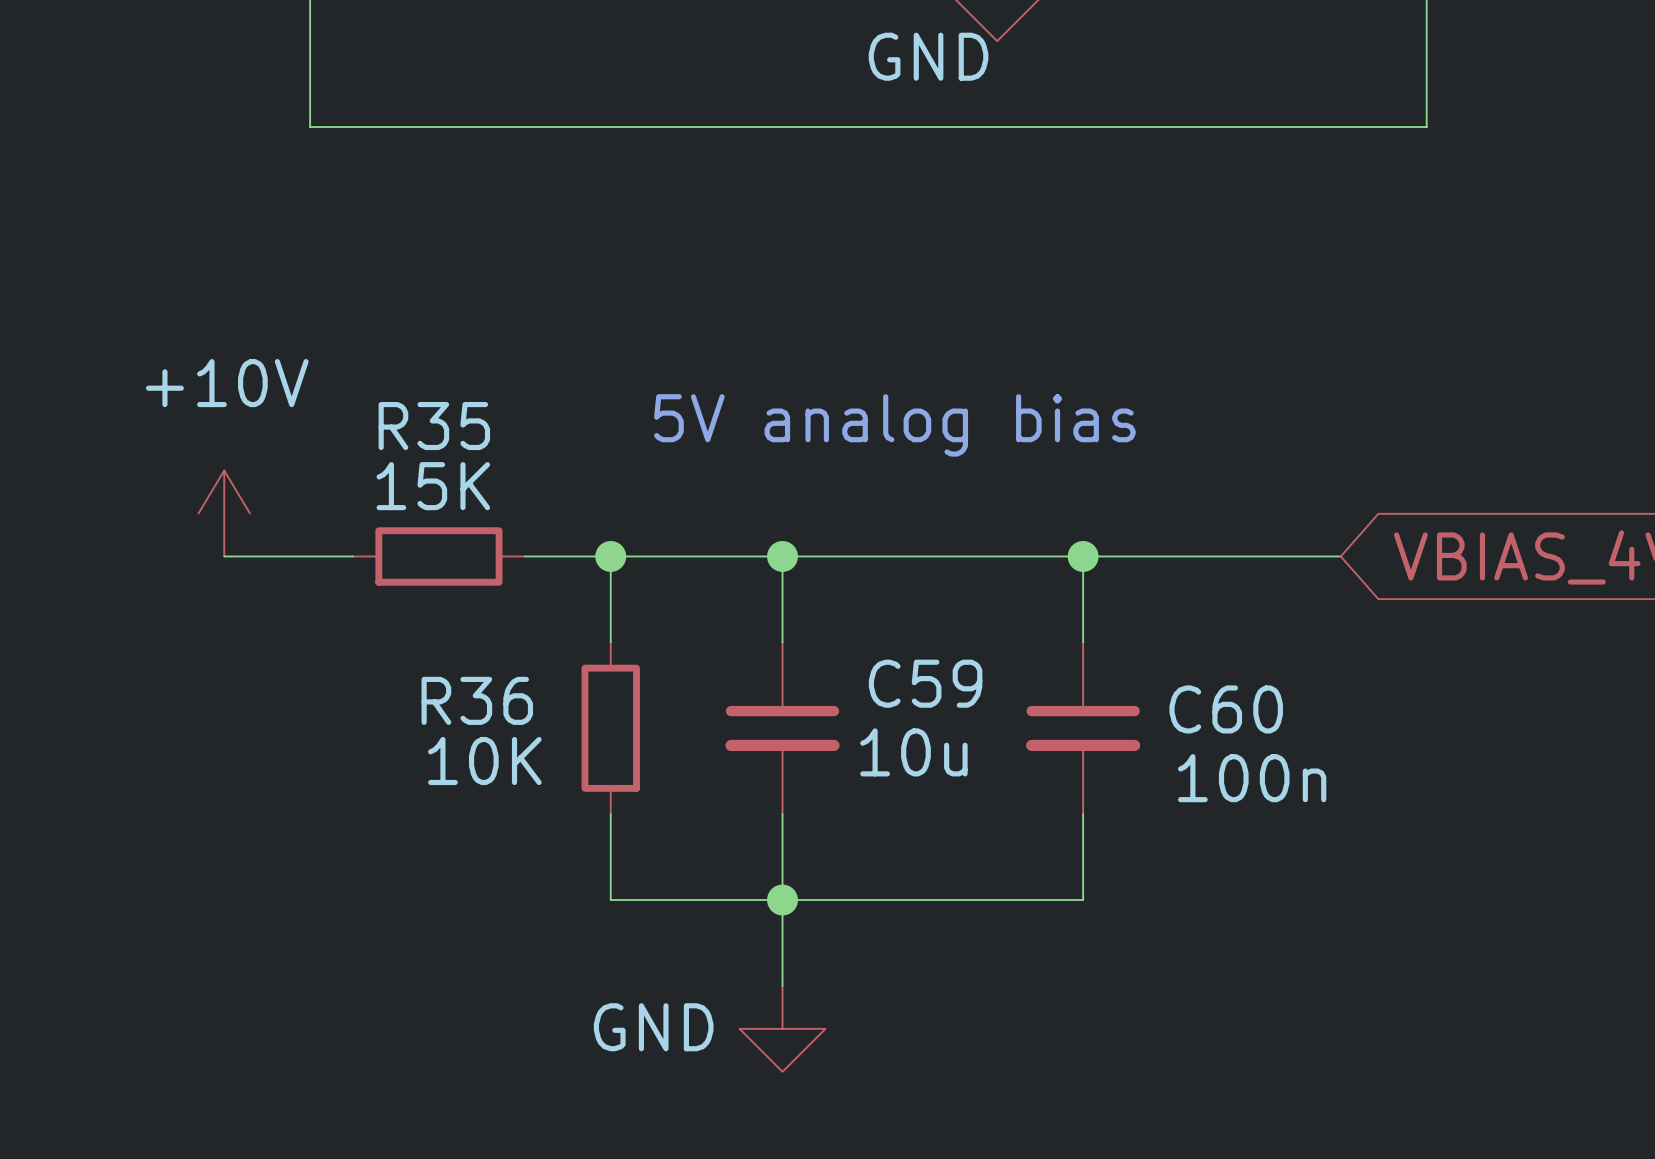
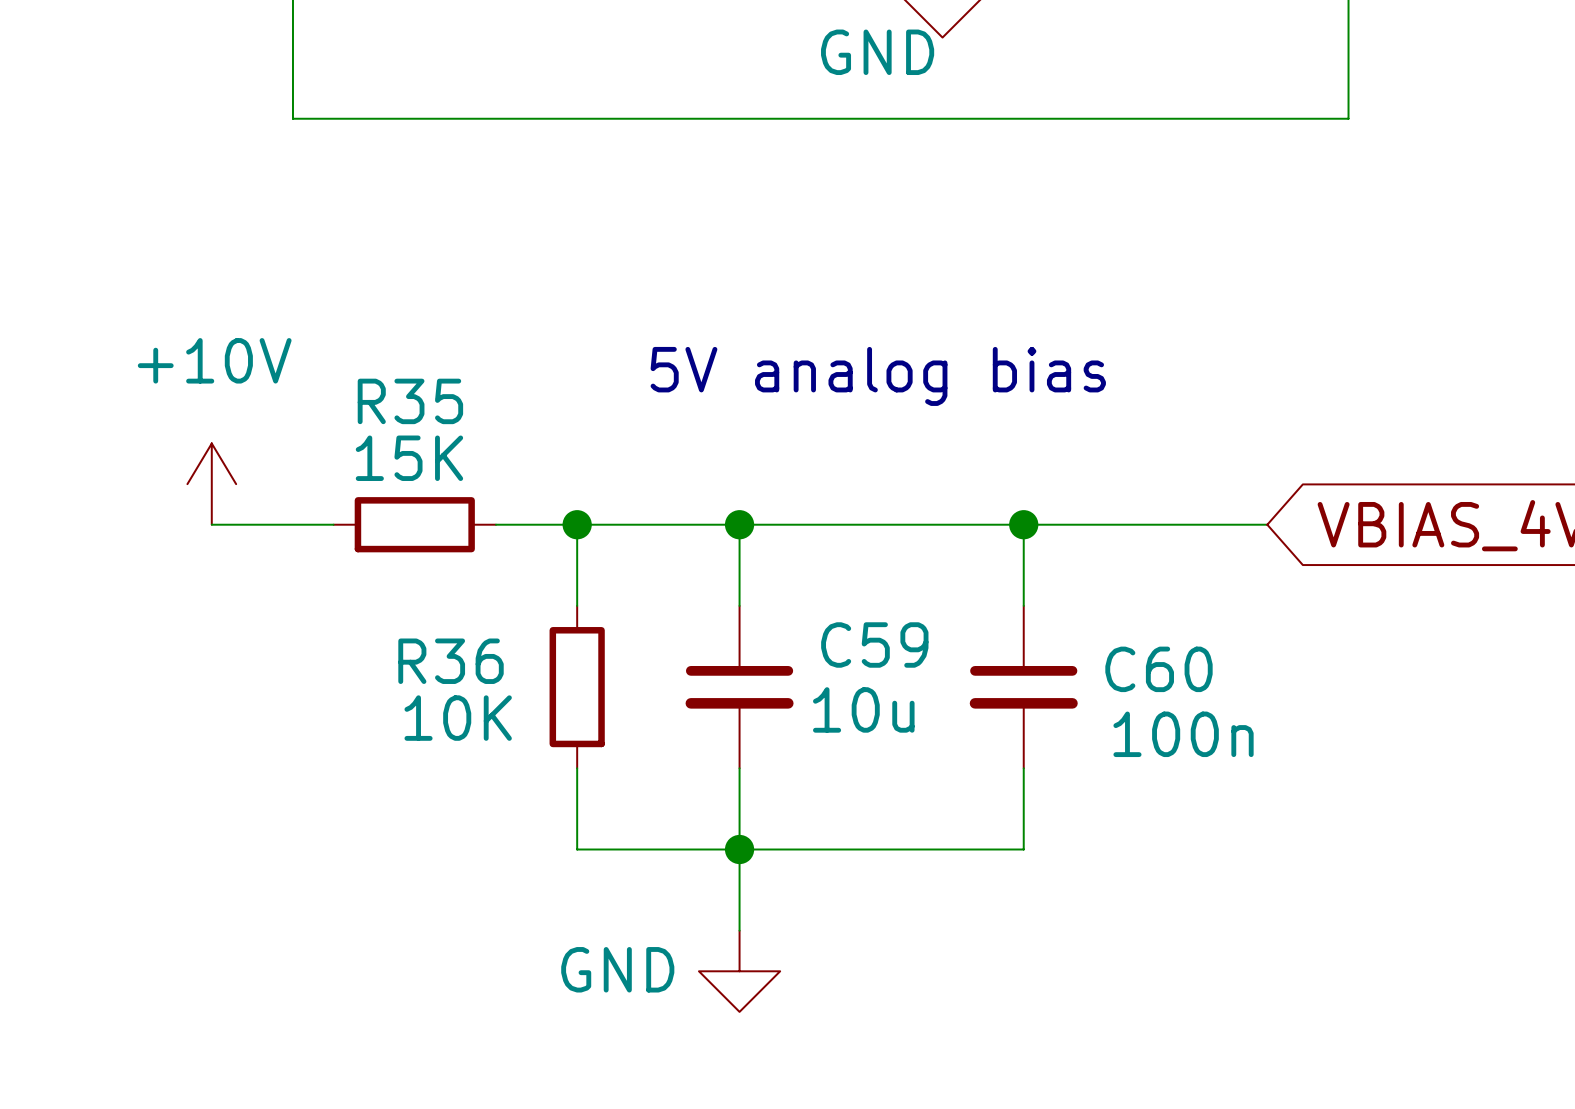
text position: 5V analog bias (894, 425) -> 5V analog bias (878, 376)

